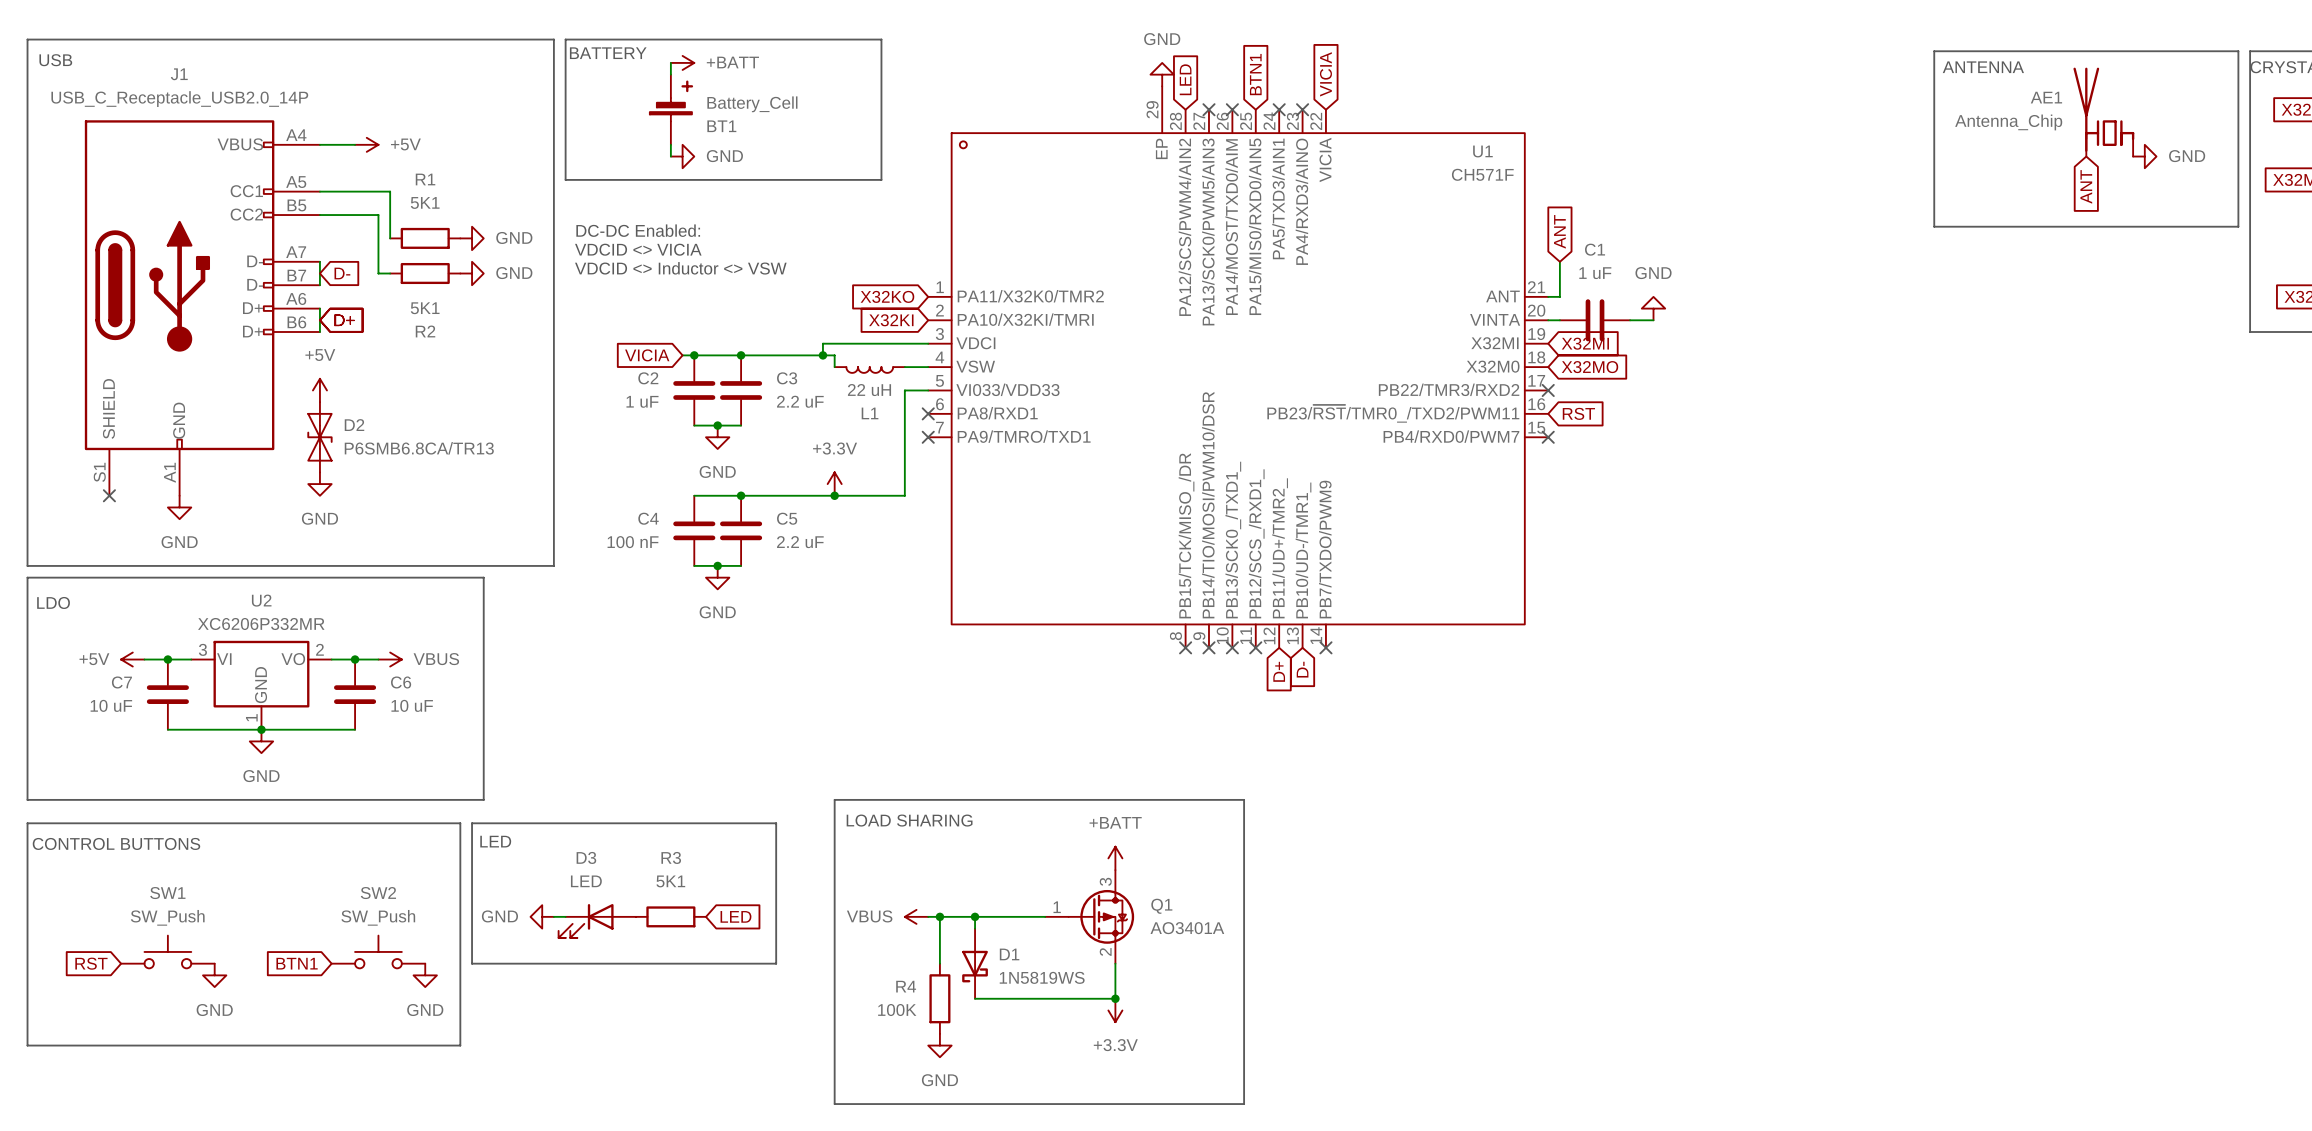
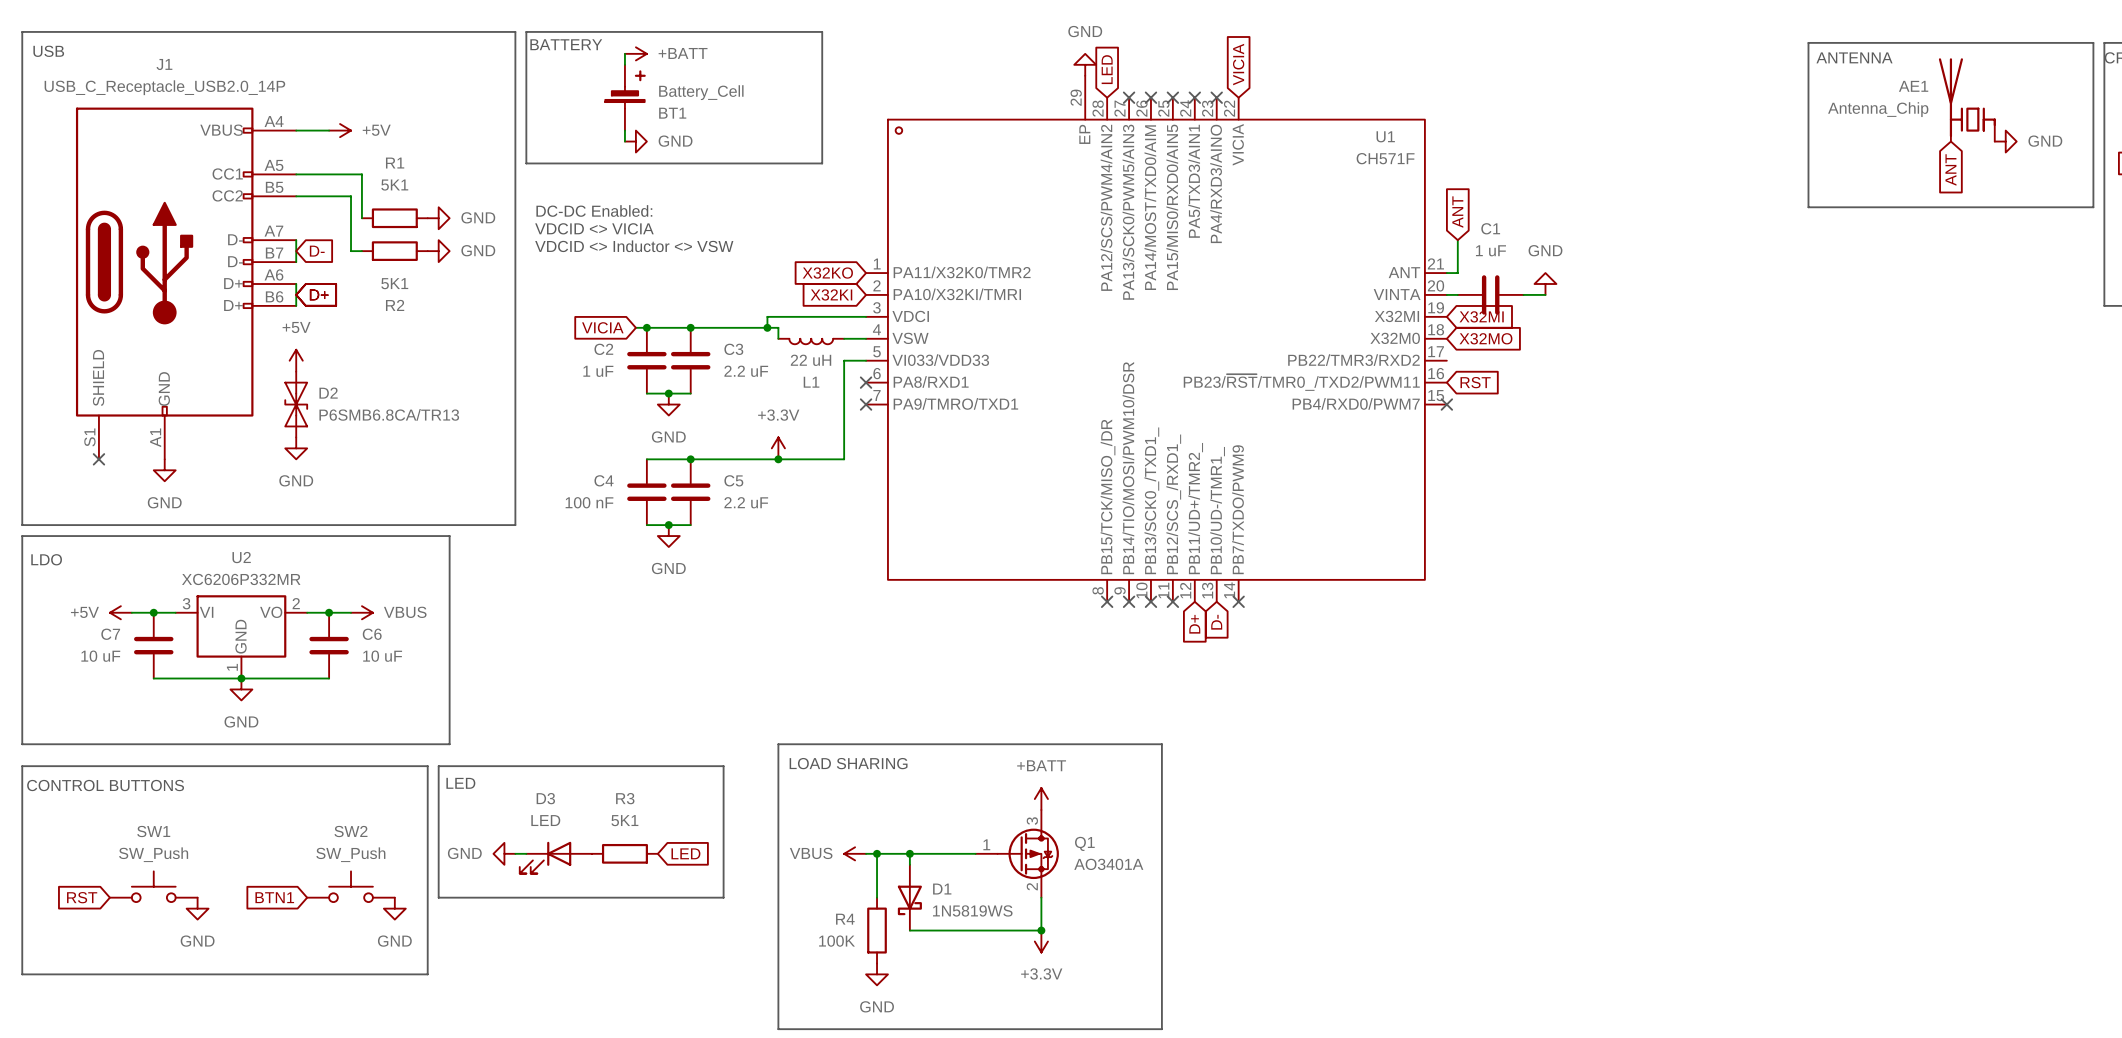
global label: BTN1 (1255, 74) -> none
no-connect mark: none -> (1172, 97)
no-connect mark: (1548, 390) -> none

